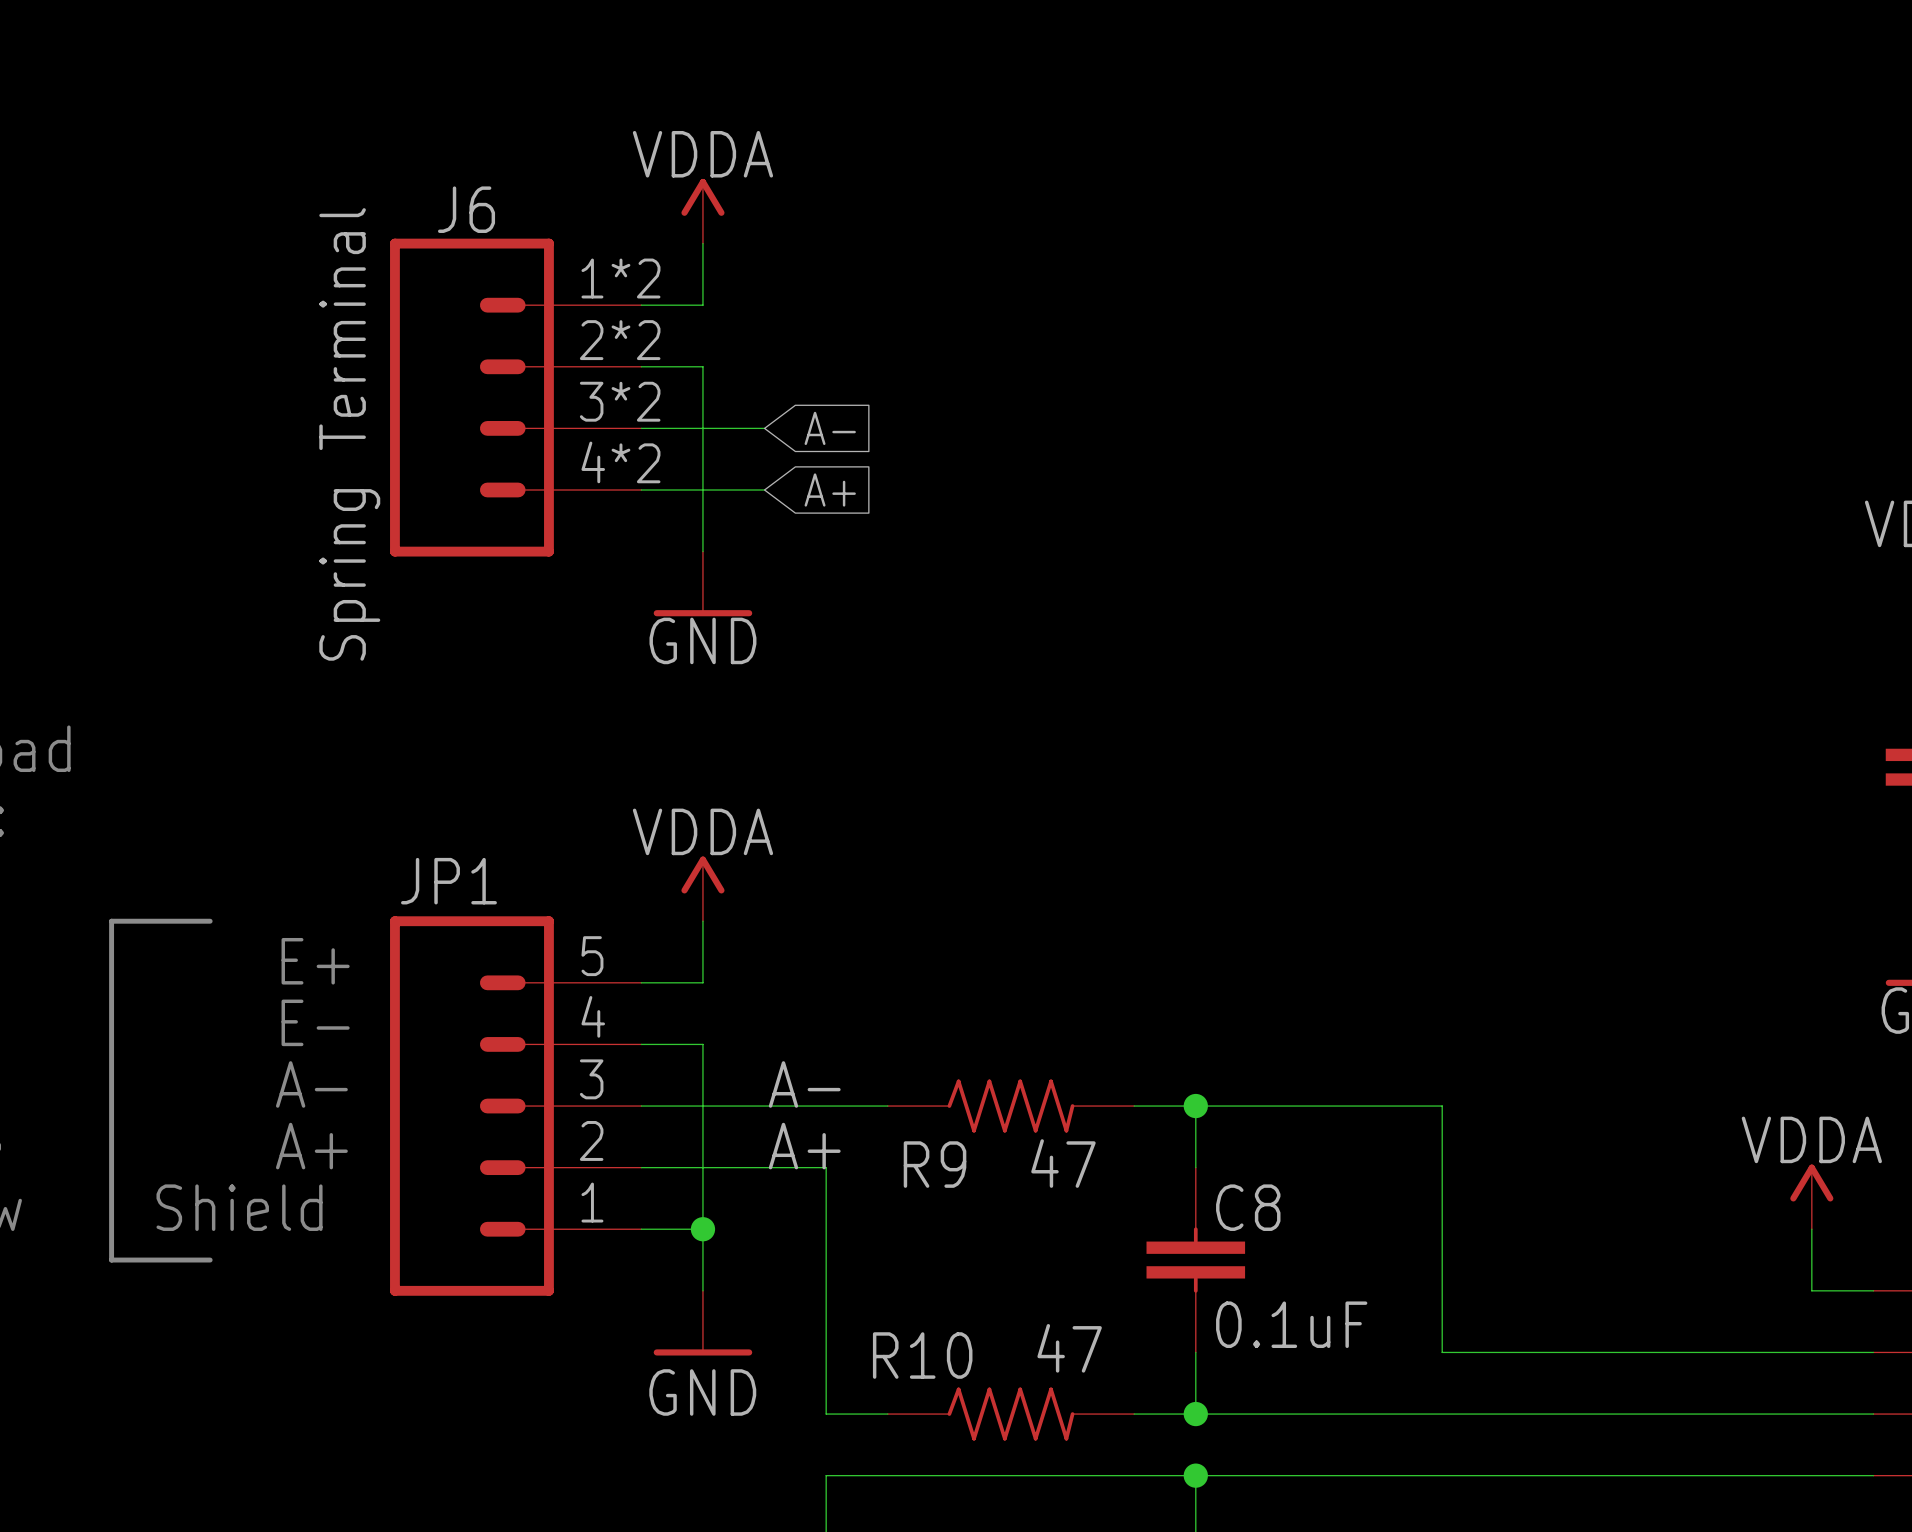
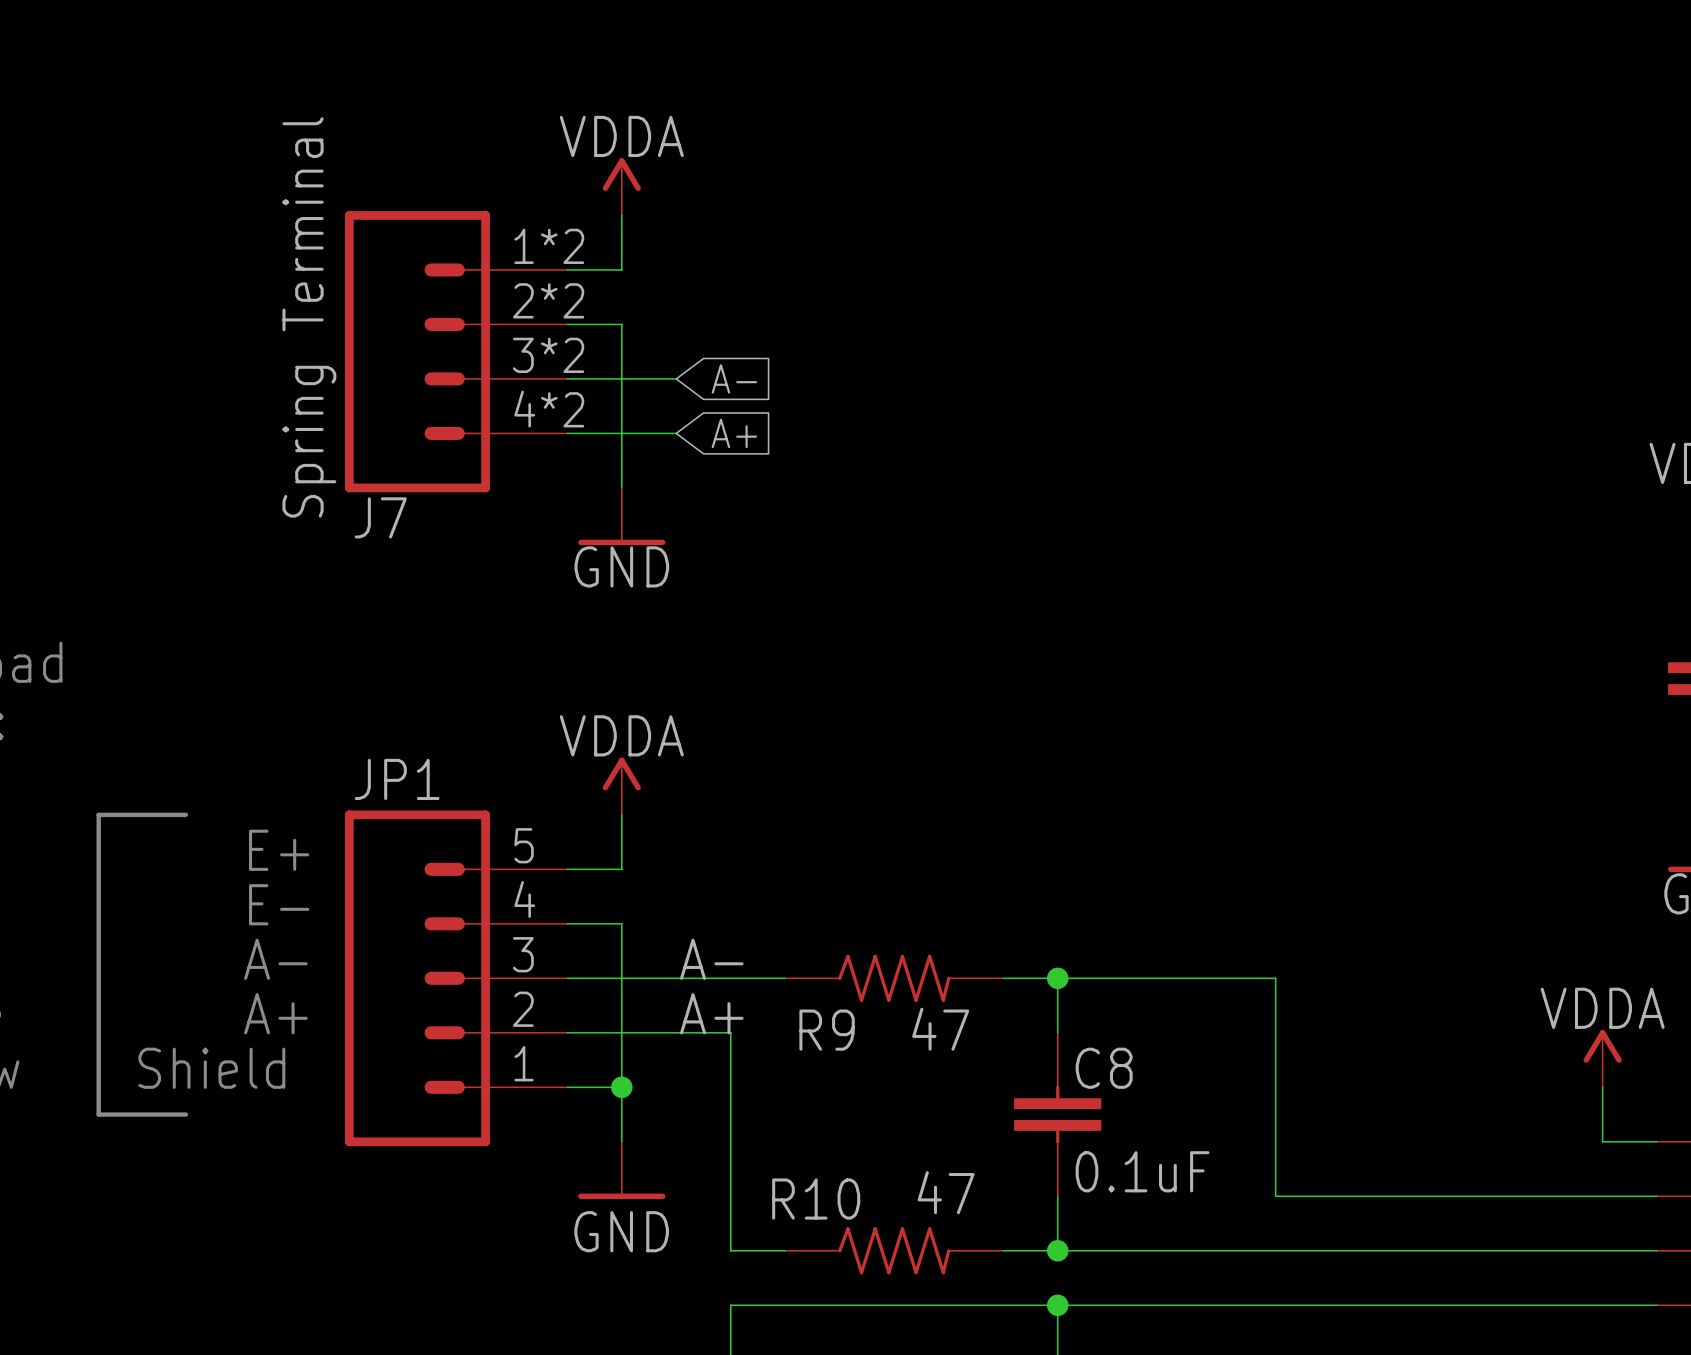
J6 name: J6 (466, 209) -> J7 (380, 517)
J6 value position: Spring Terminal (349, 434) -> Spring Terminal (309, 317)

